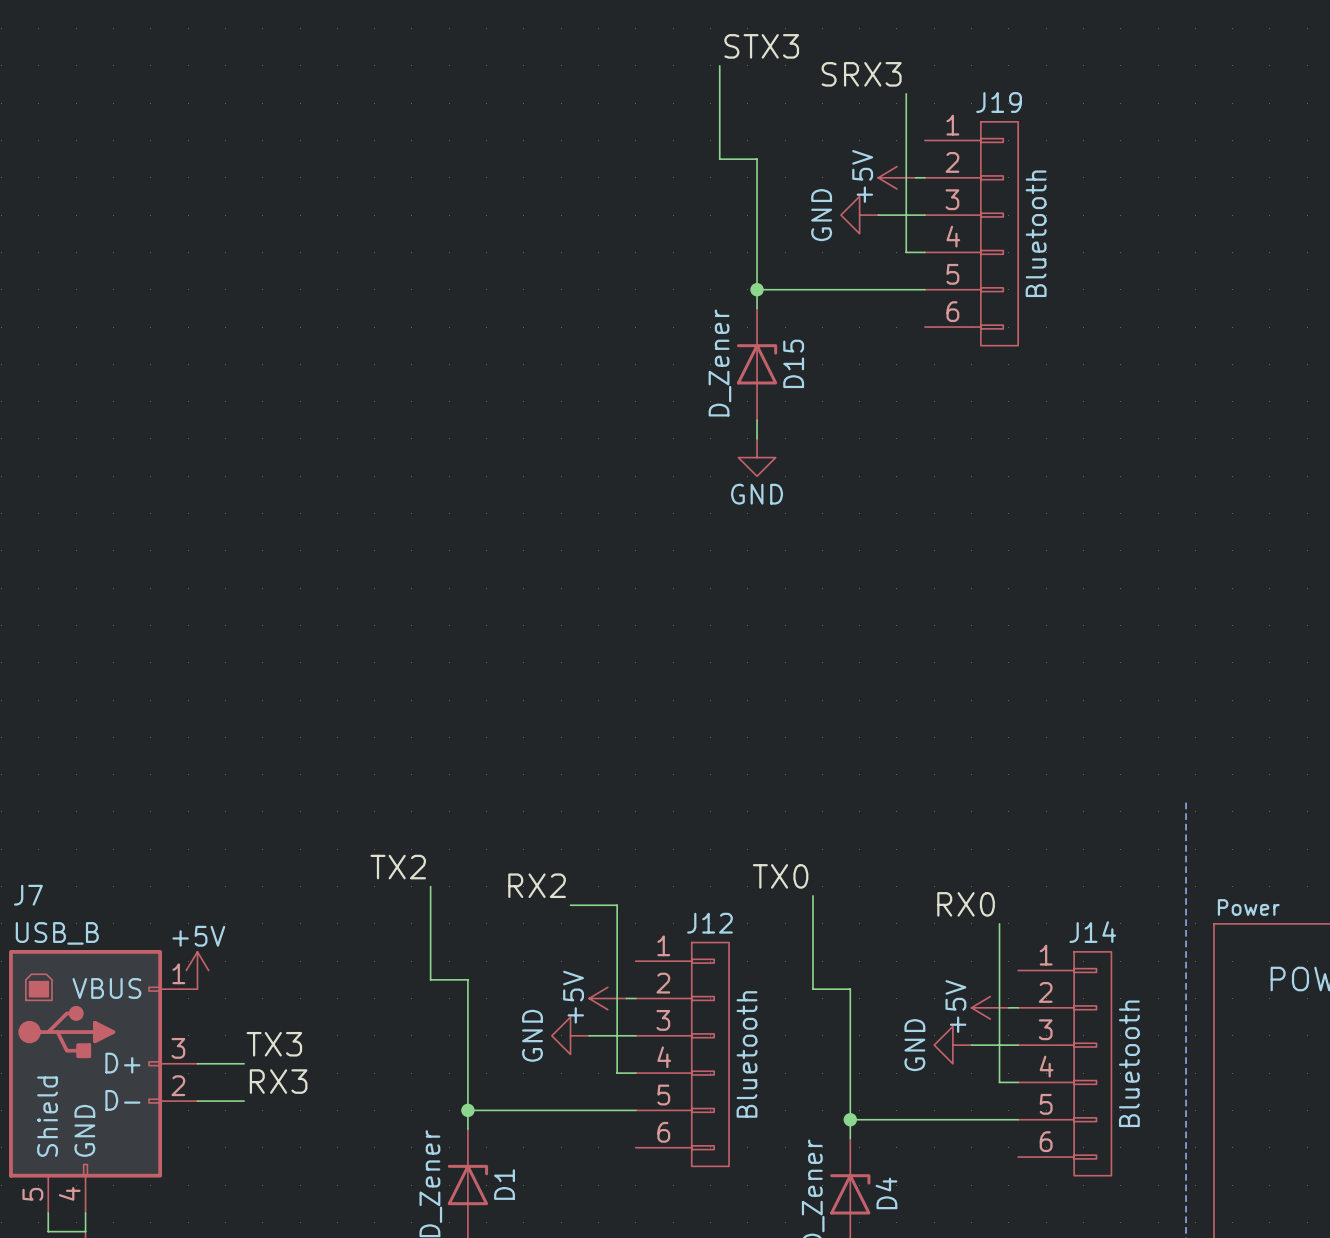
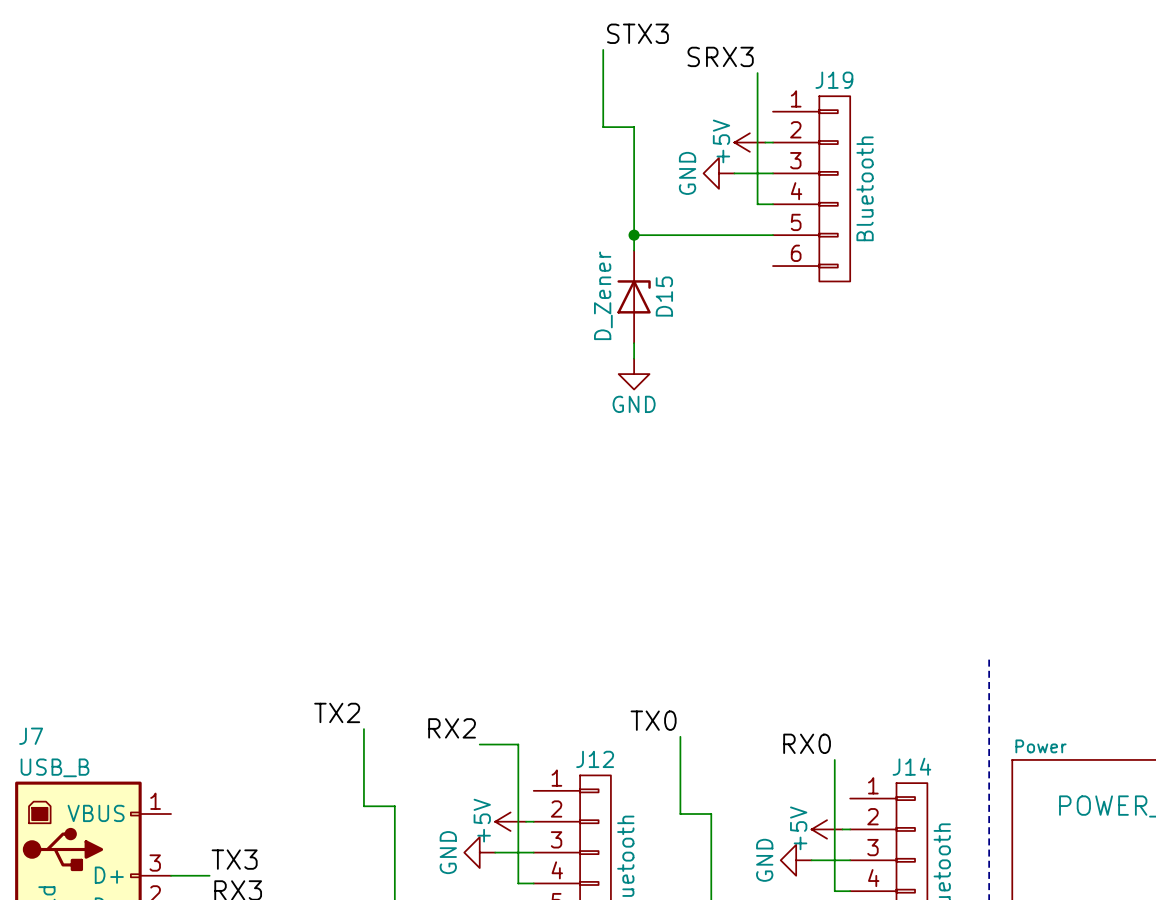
power symbol: +5V (197, 970) -> none

